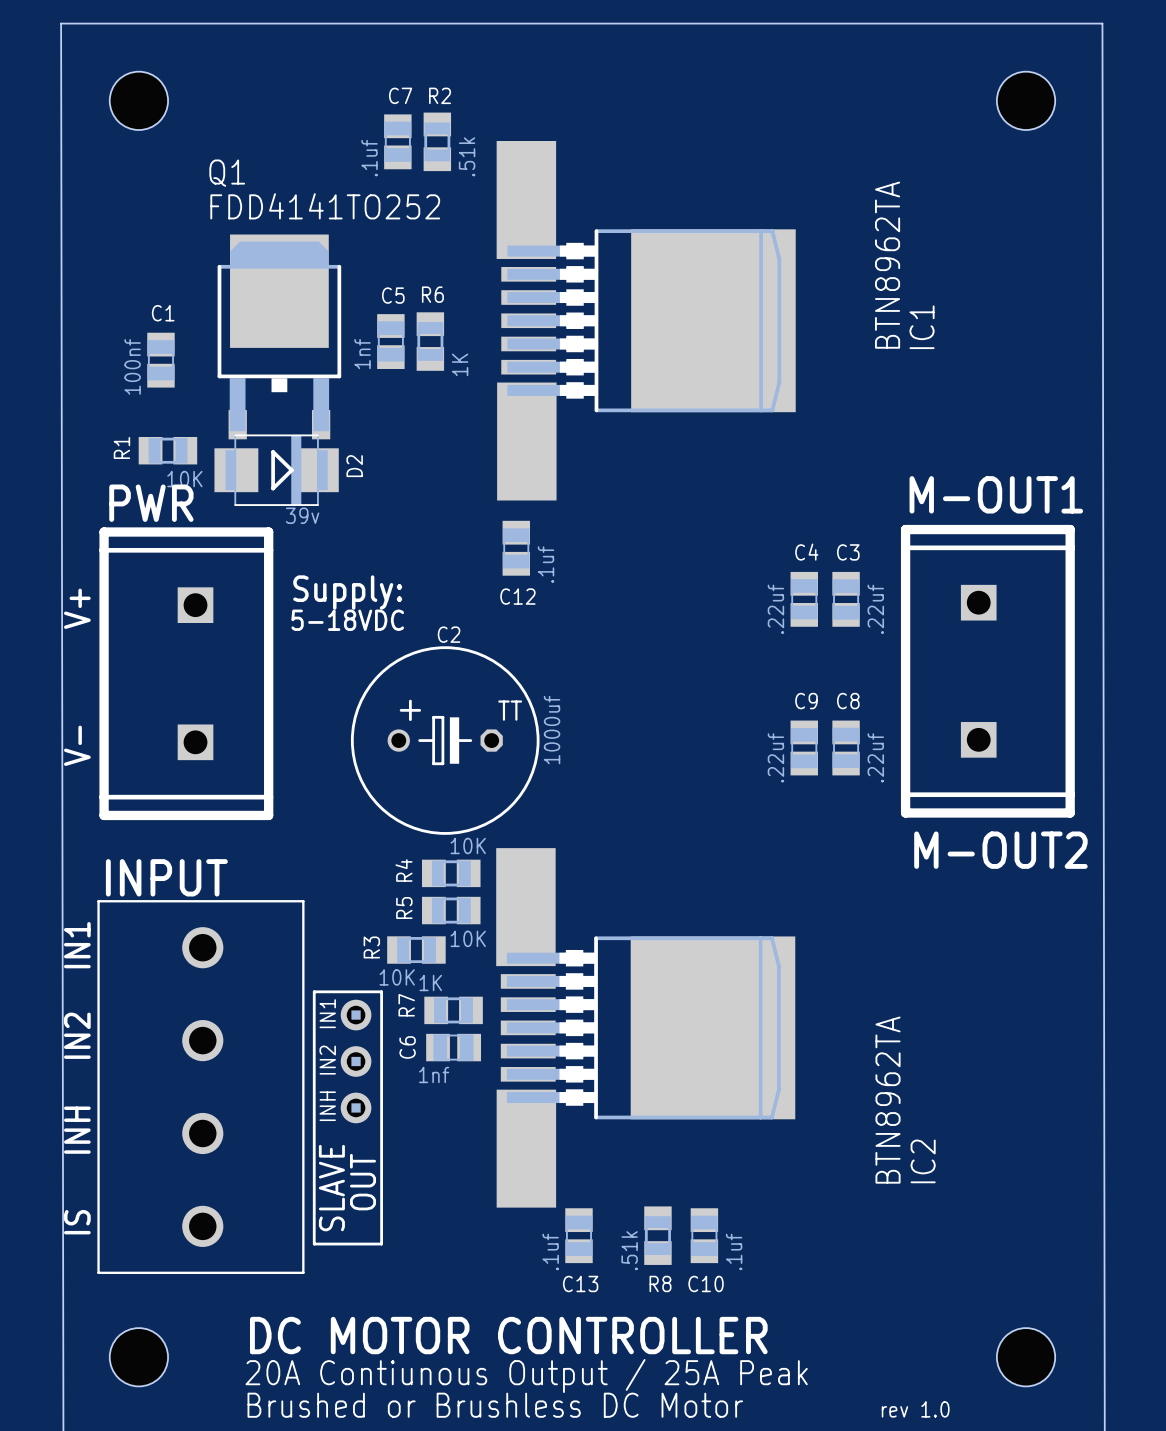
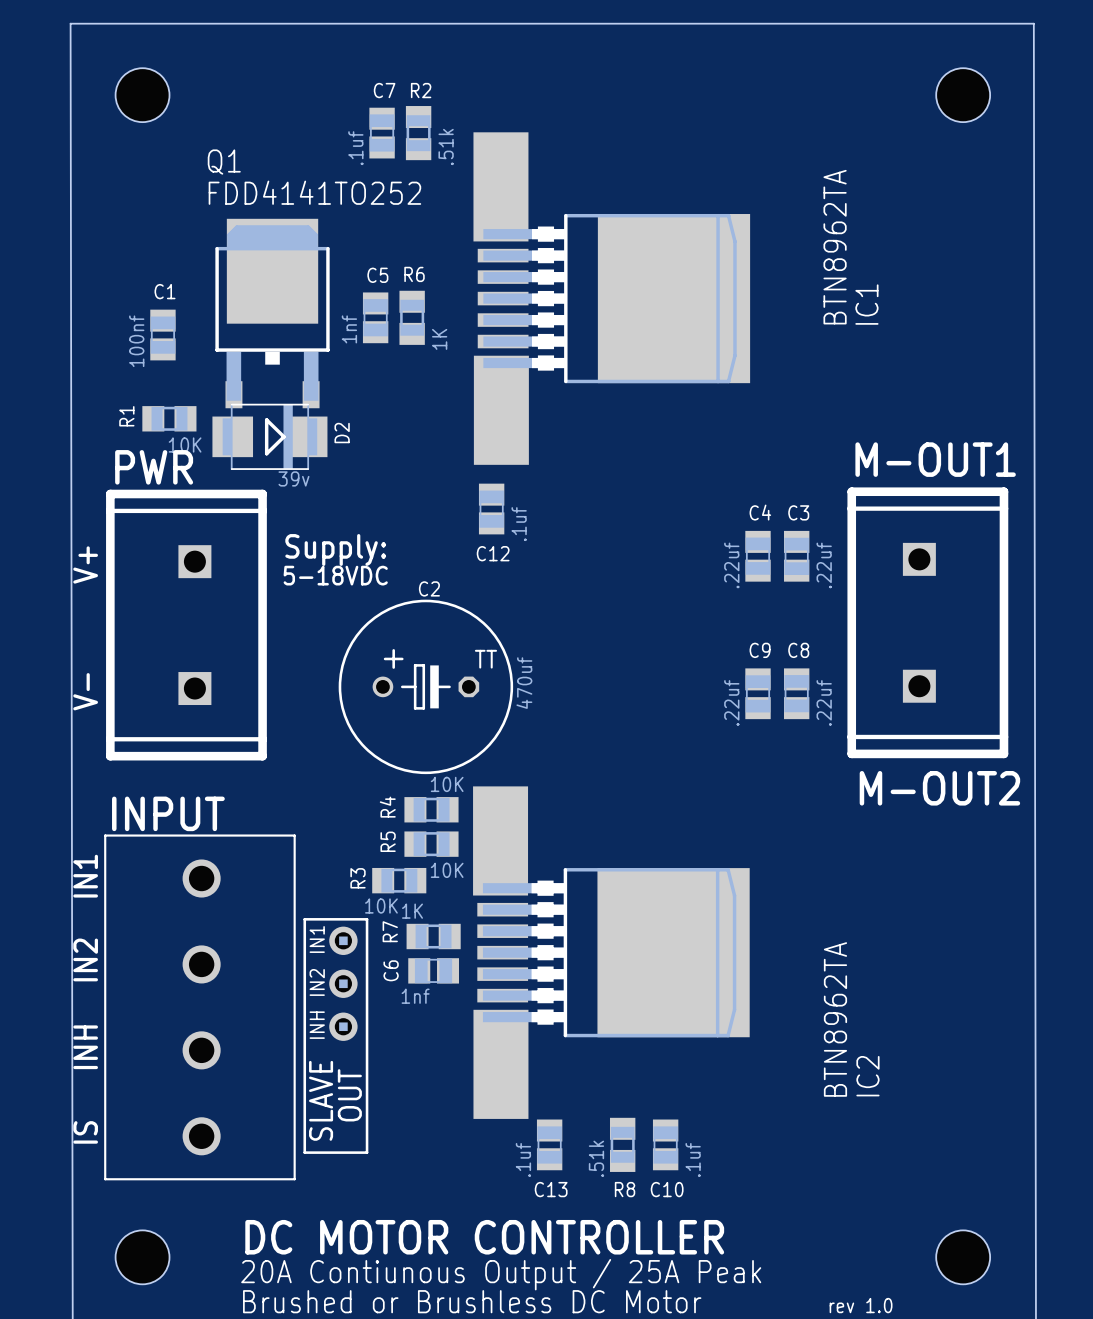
C2 value: 1000uf (552, 730) -> 470uf (524, 683)

